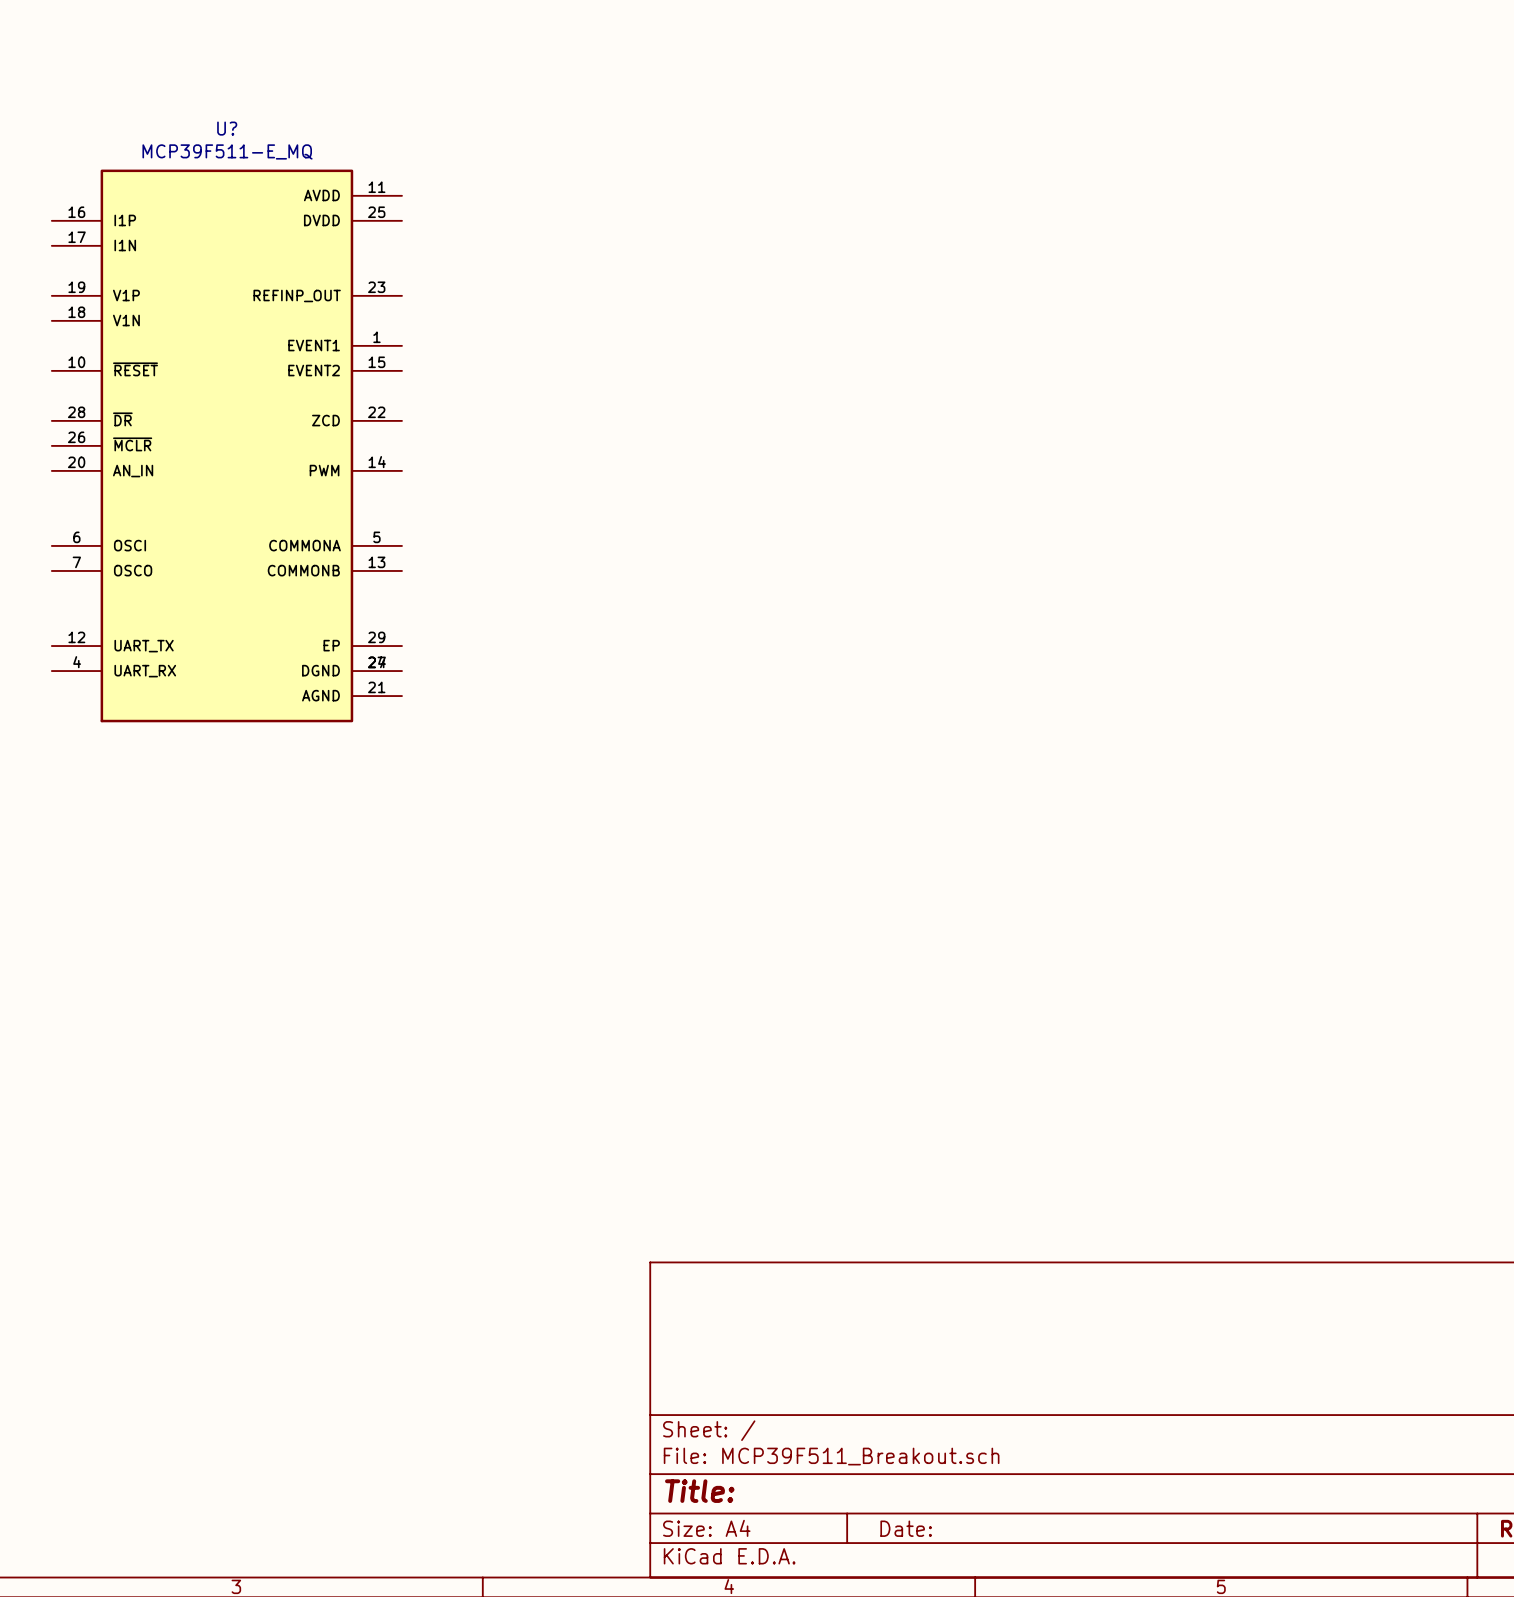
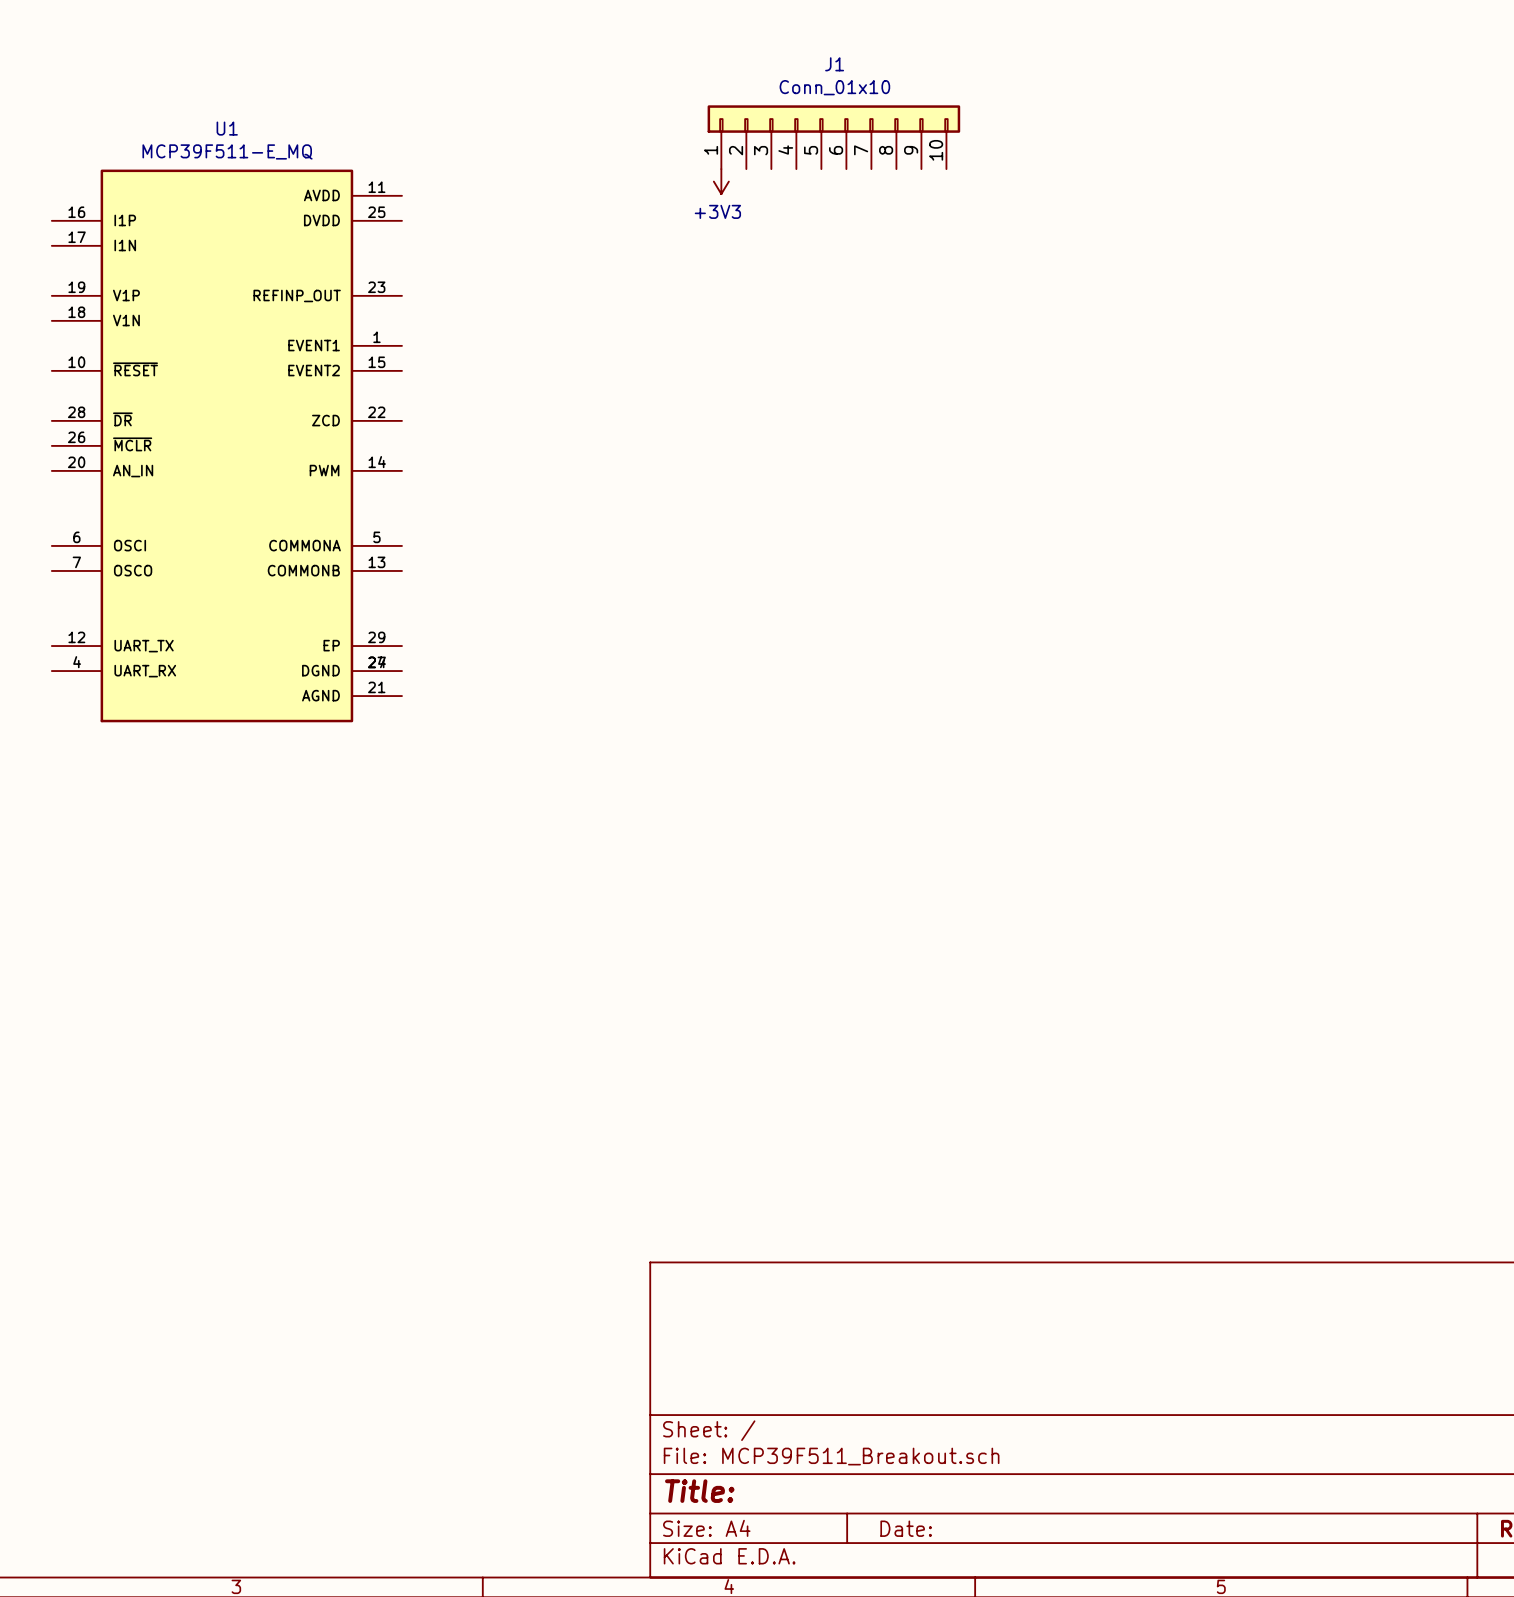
U? name: U? (227, 128) -> U1 (227, 128)
J1: none -> Conn_01x10 (833, 137)
power symbol: none -> +3V3 (721, 181)

